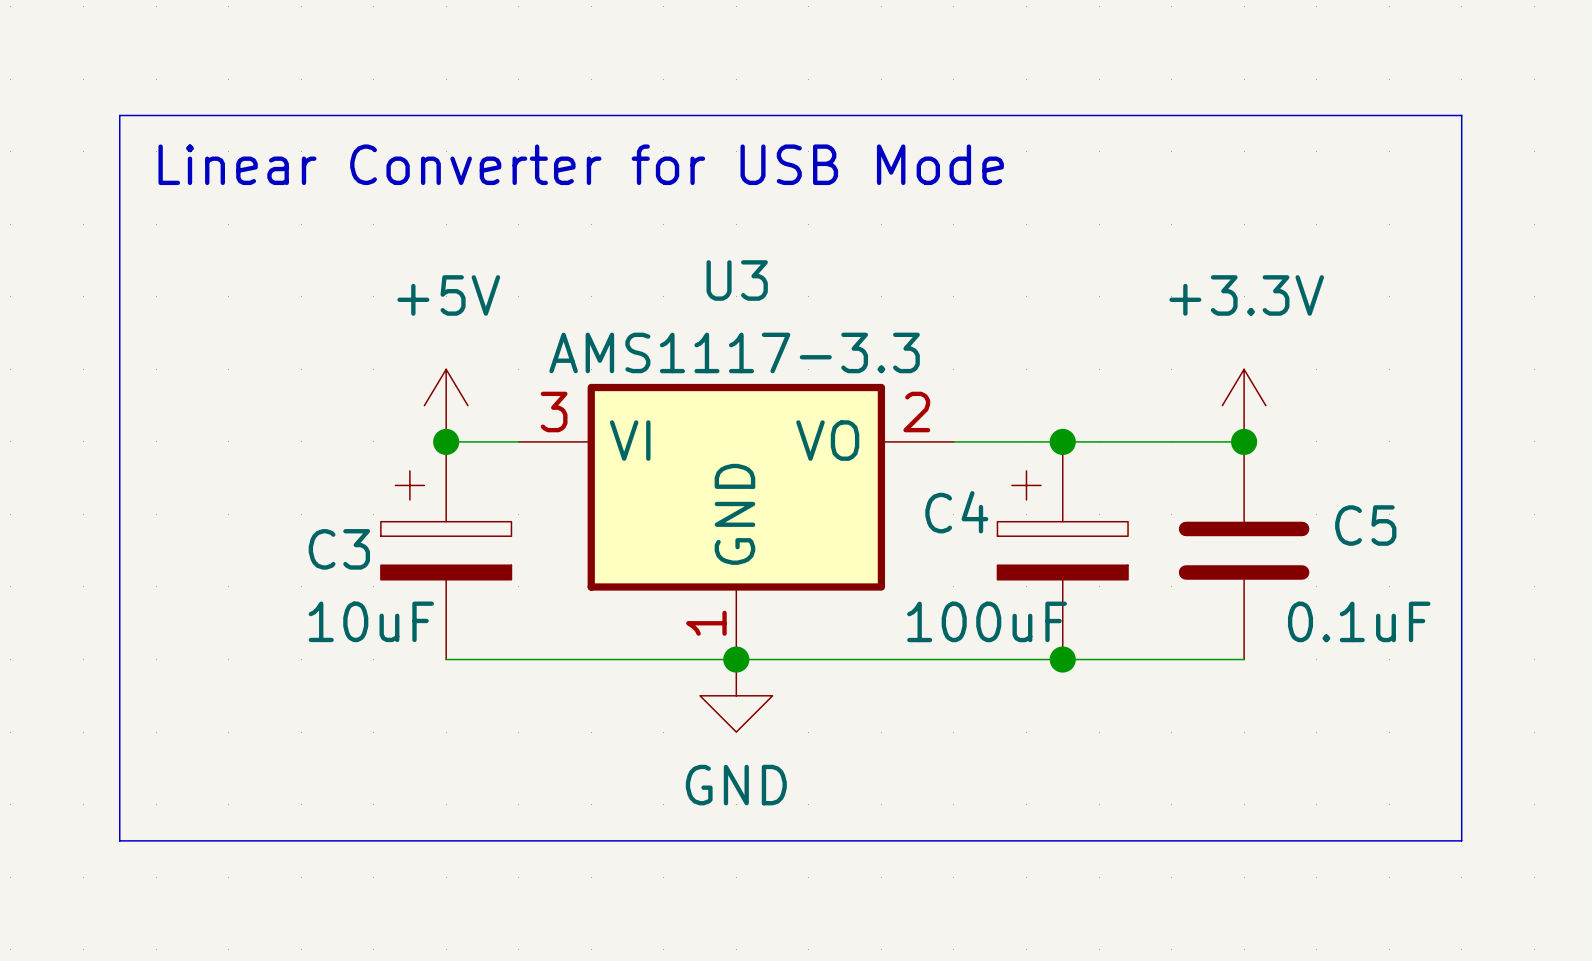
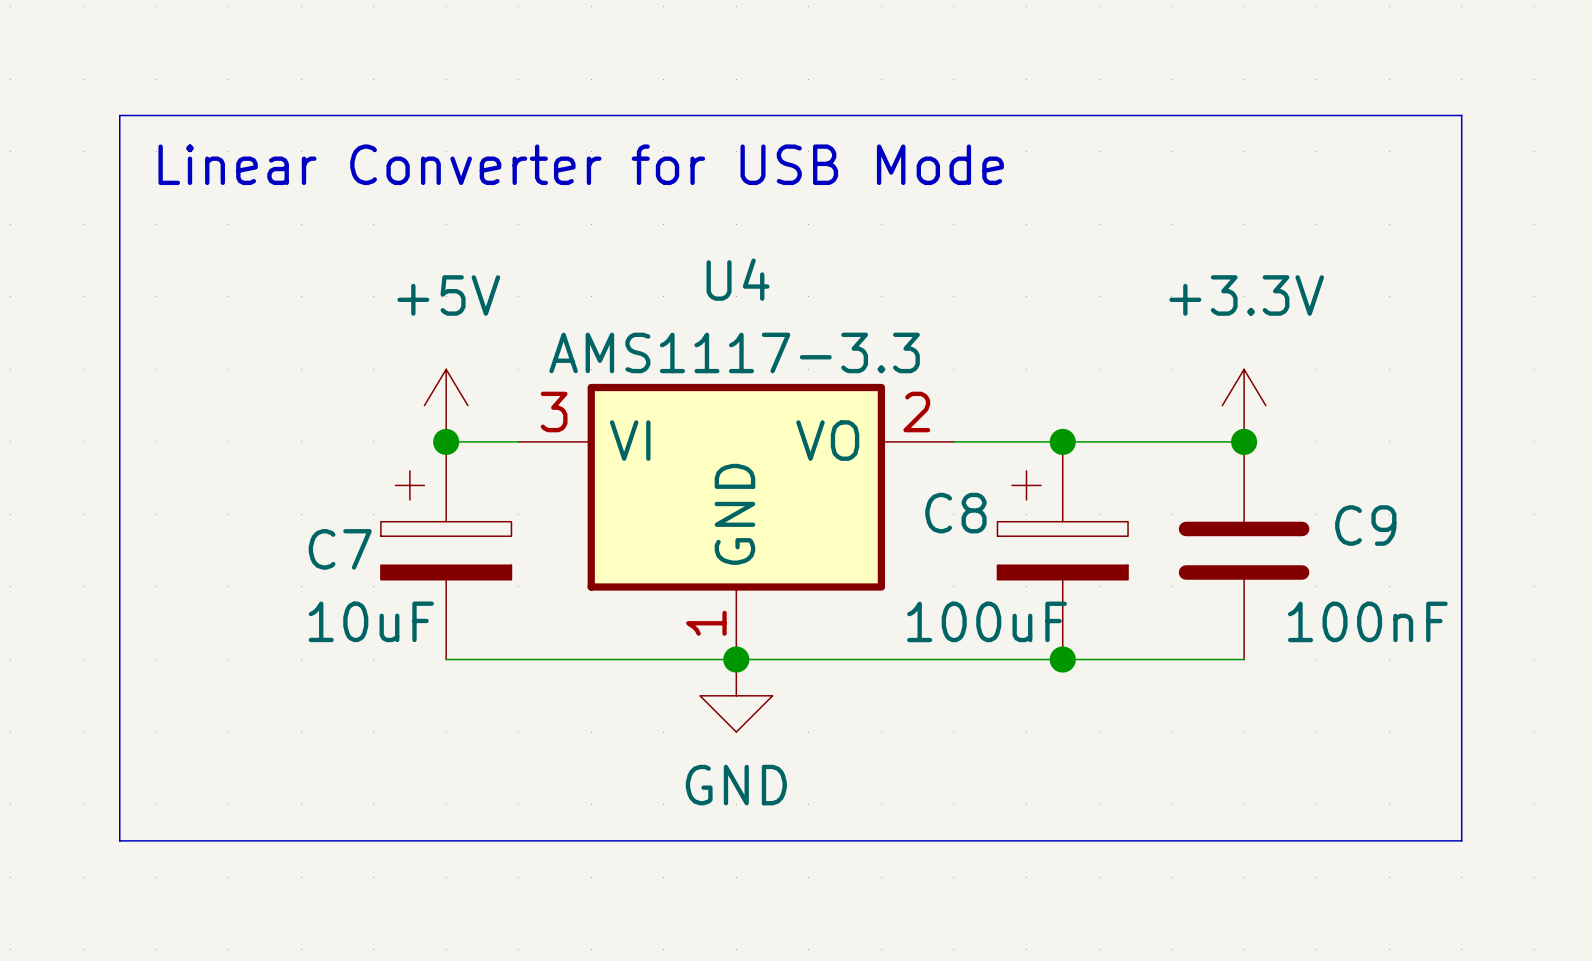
U3 name: U3 (737, 280) -> U4 (738, 279)
C4 name: C4 (956, 512) -> C8 (955, 513)
C5 name: C5 (1365, 525) -> C9 (1365, 525)
C3 name: C3 (339, 549) -> C7 (340, 549)
C5 value: 0.1uF (1359, 621) -> 100nF (1367, 621)

